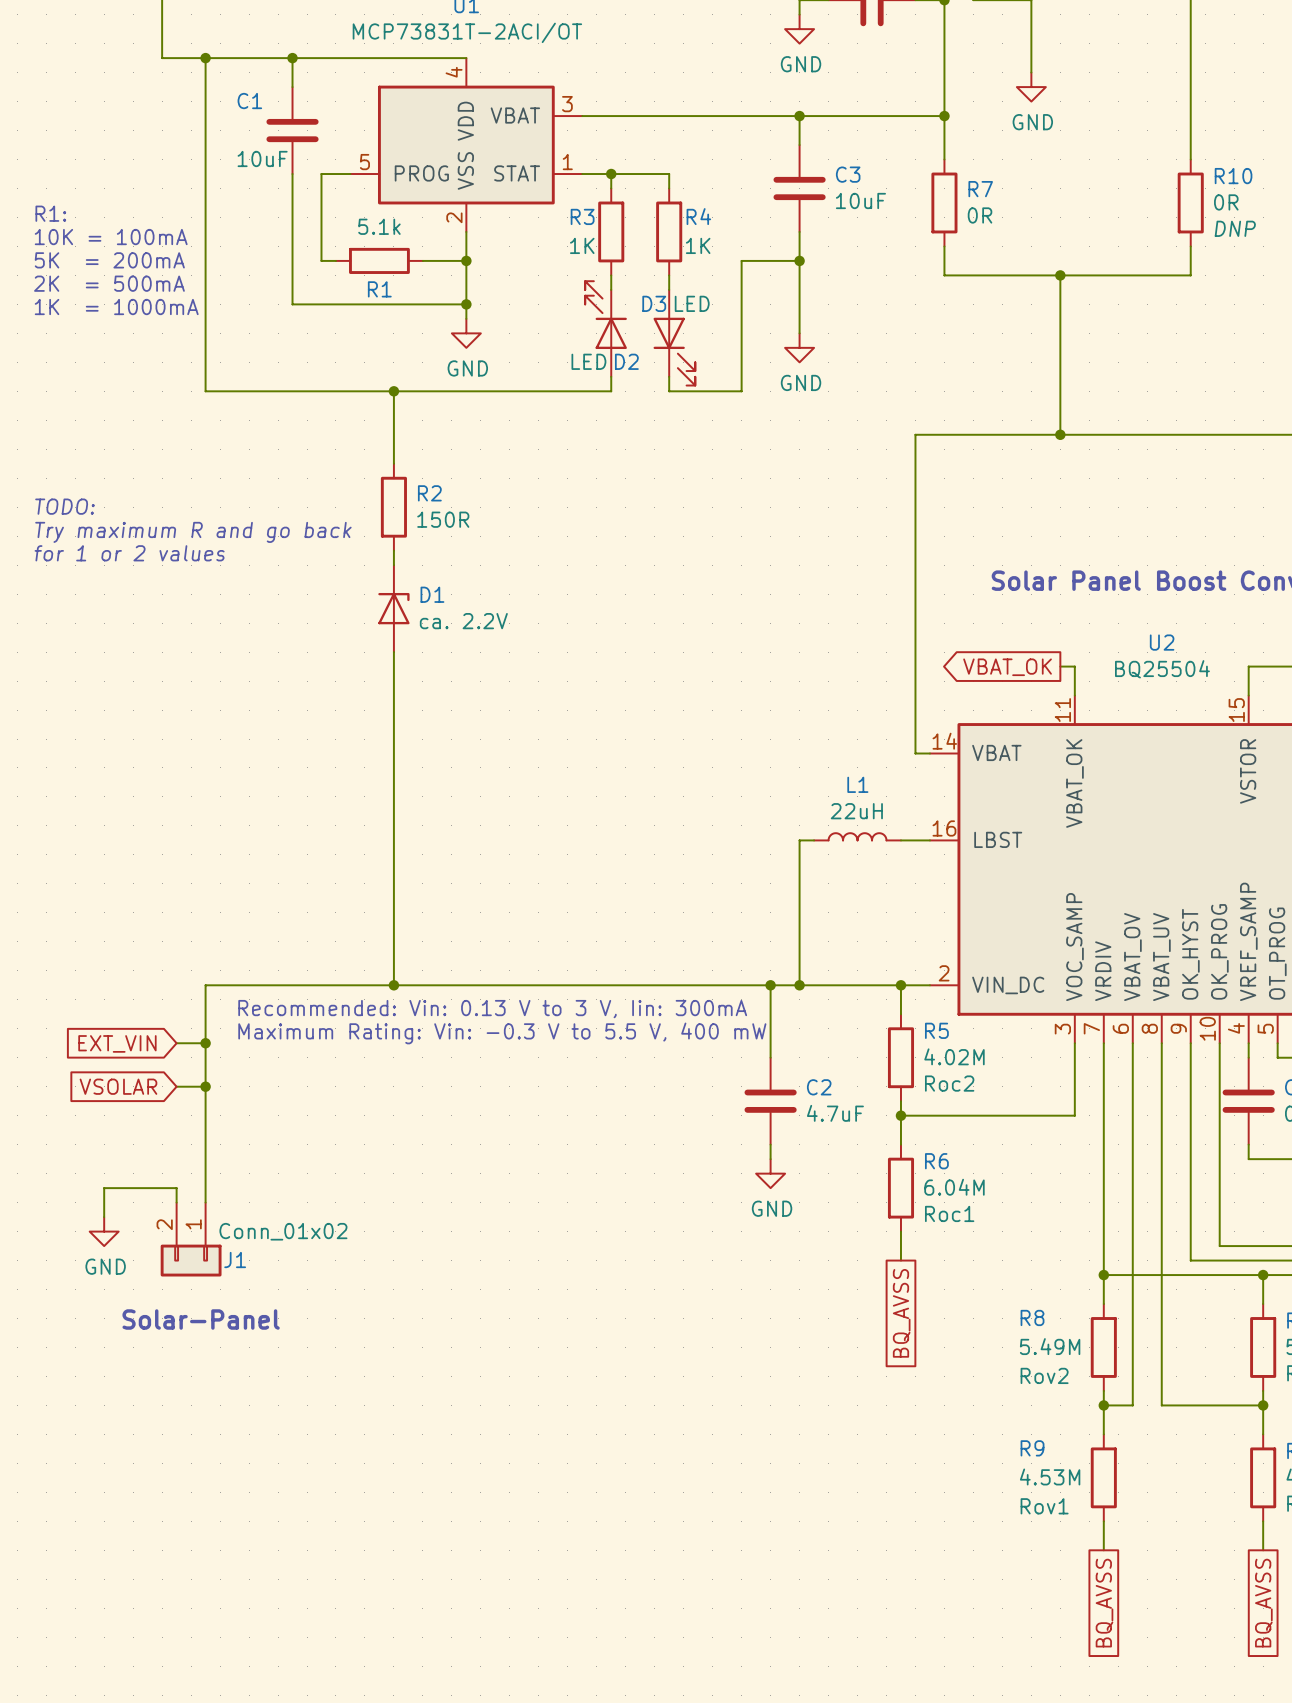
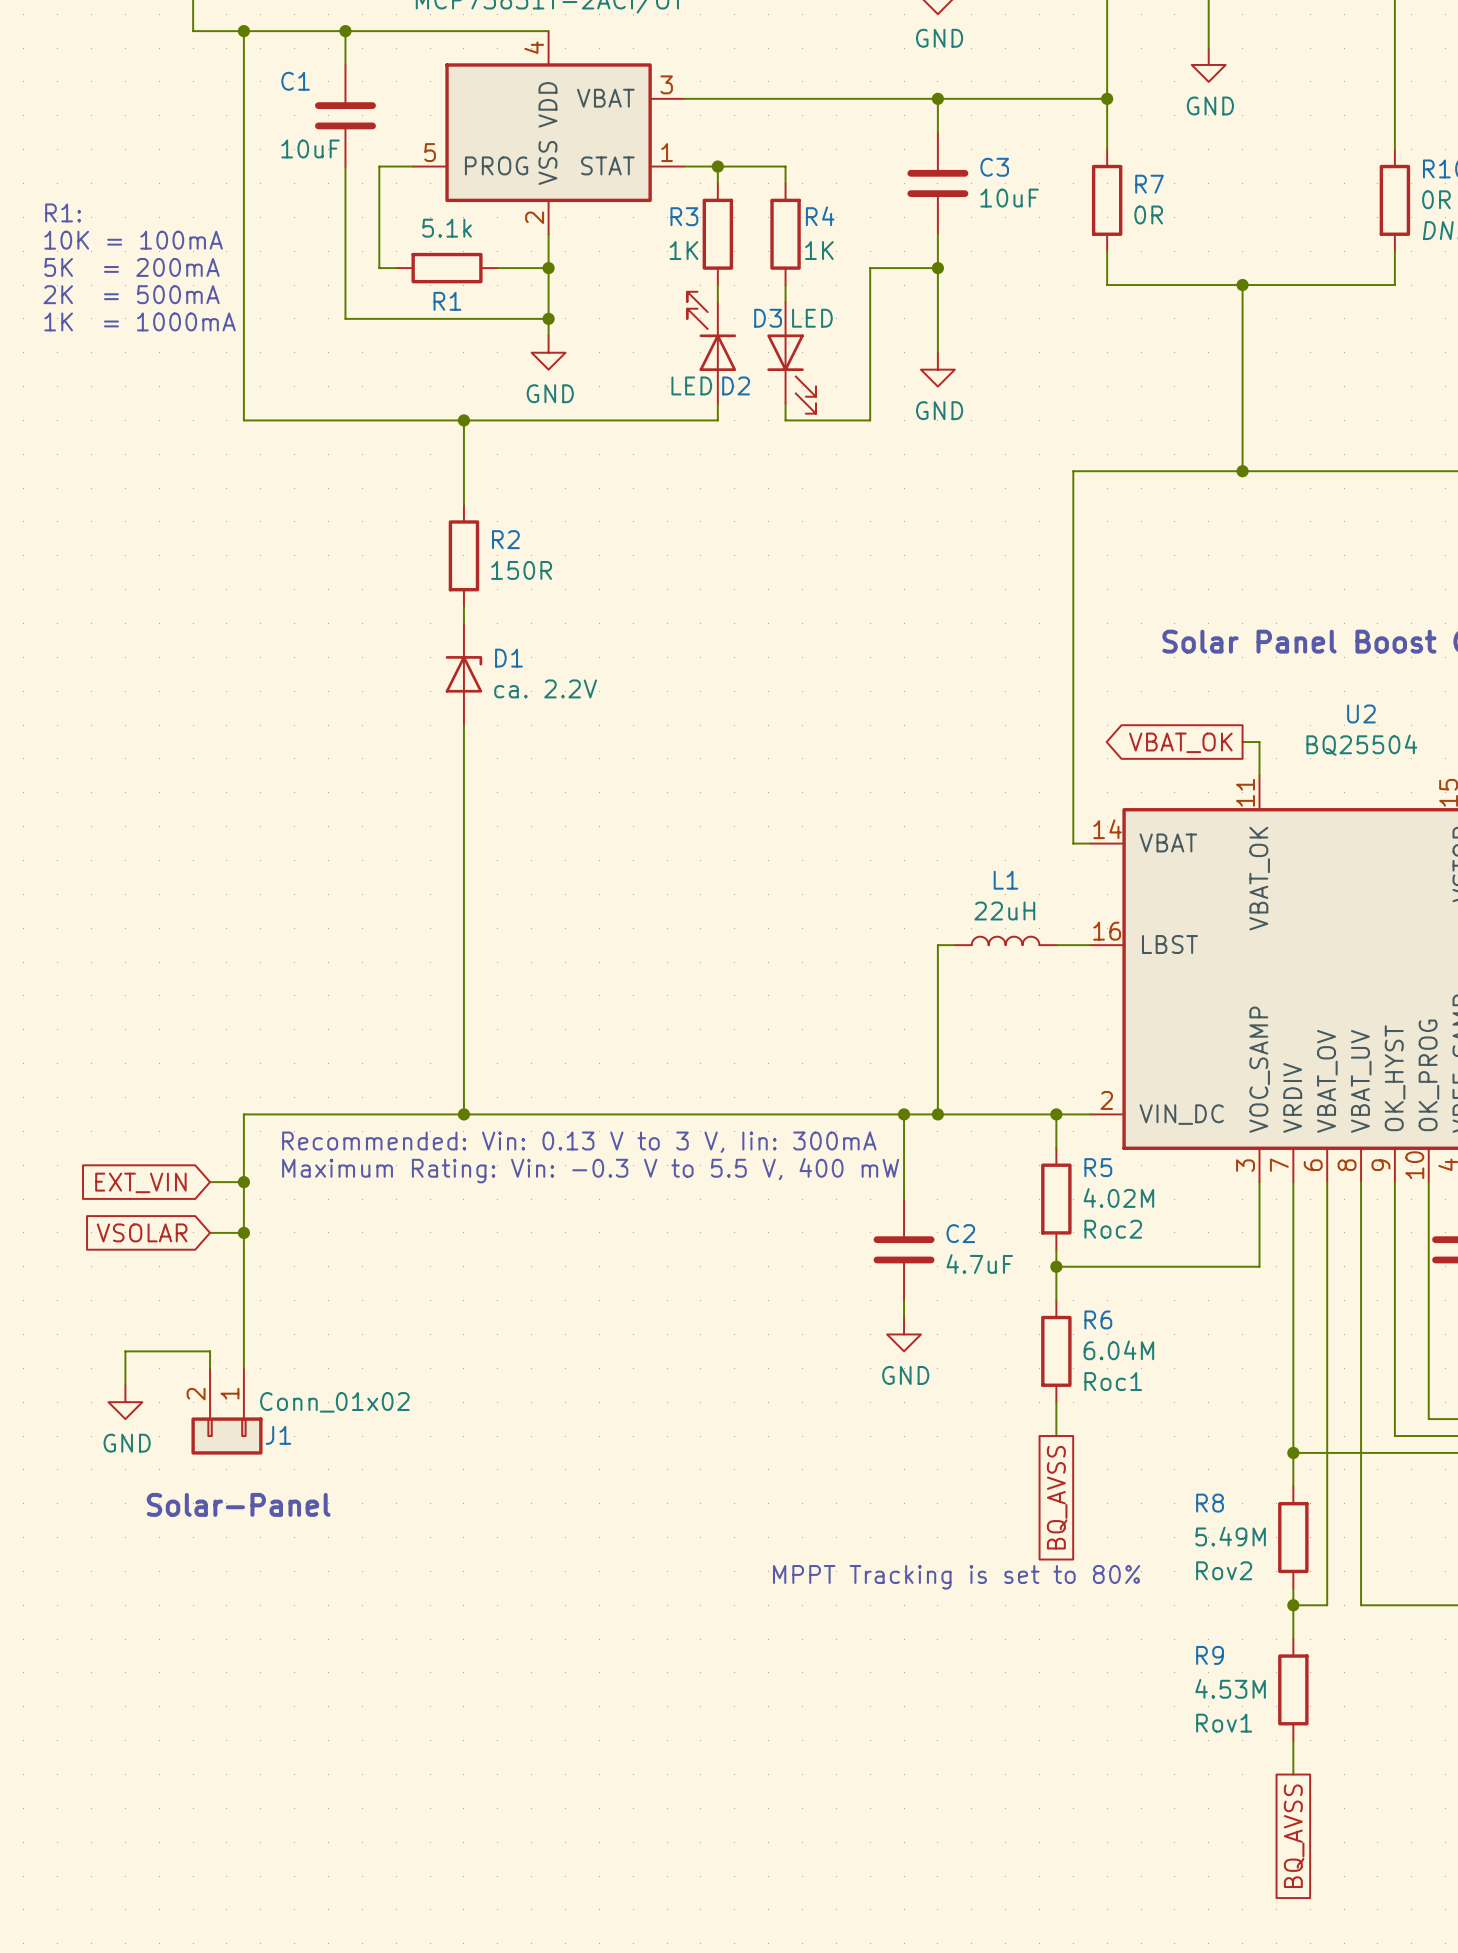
text: TODO: (65, 506) -> none
text: Try maximum R and go back (193, 532) -> none
text: for 1 or 2 values (129, 553) -> none
text: none -> MPPT Tracking is set to 80% (956, 1577)

